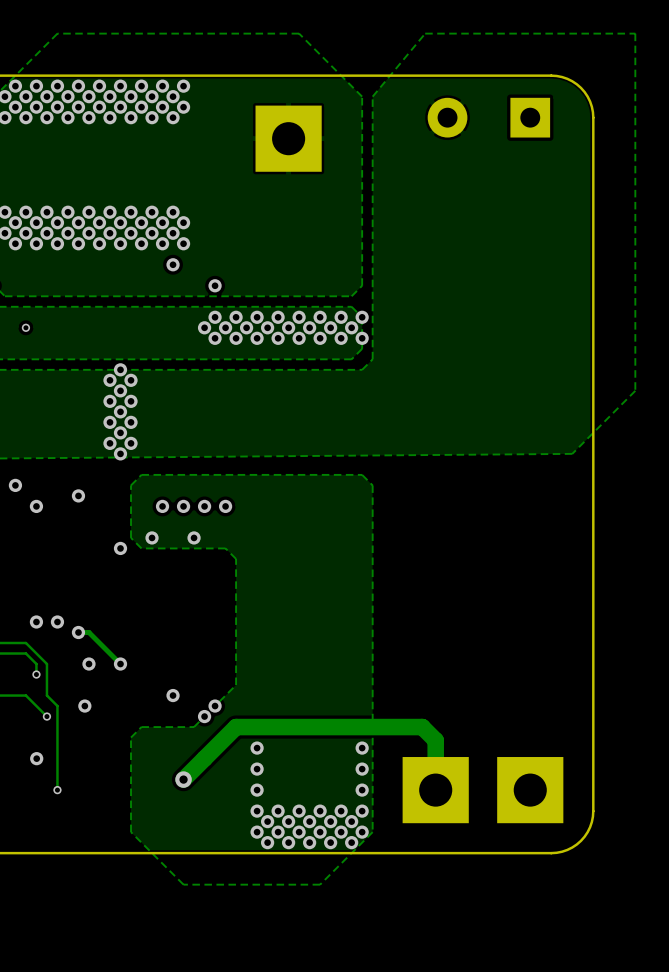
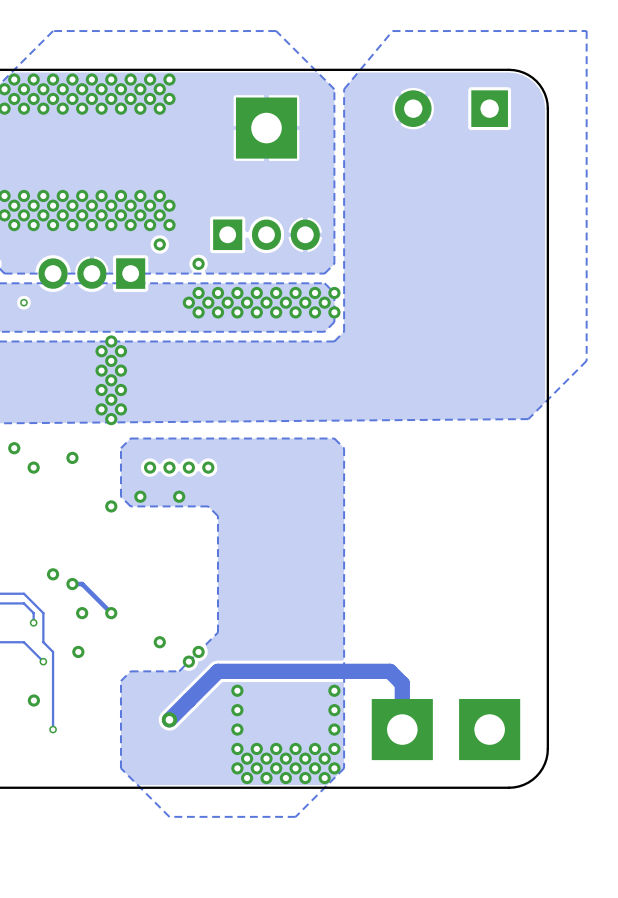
part: none -> (266, 234)
part: none -> (91, 273)
via: (36, 621) -> none

